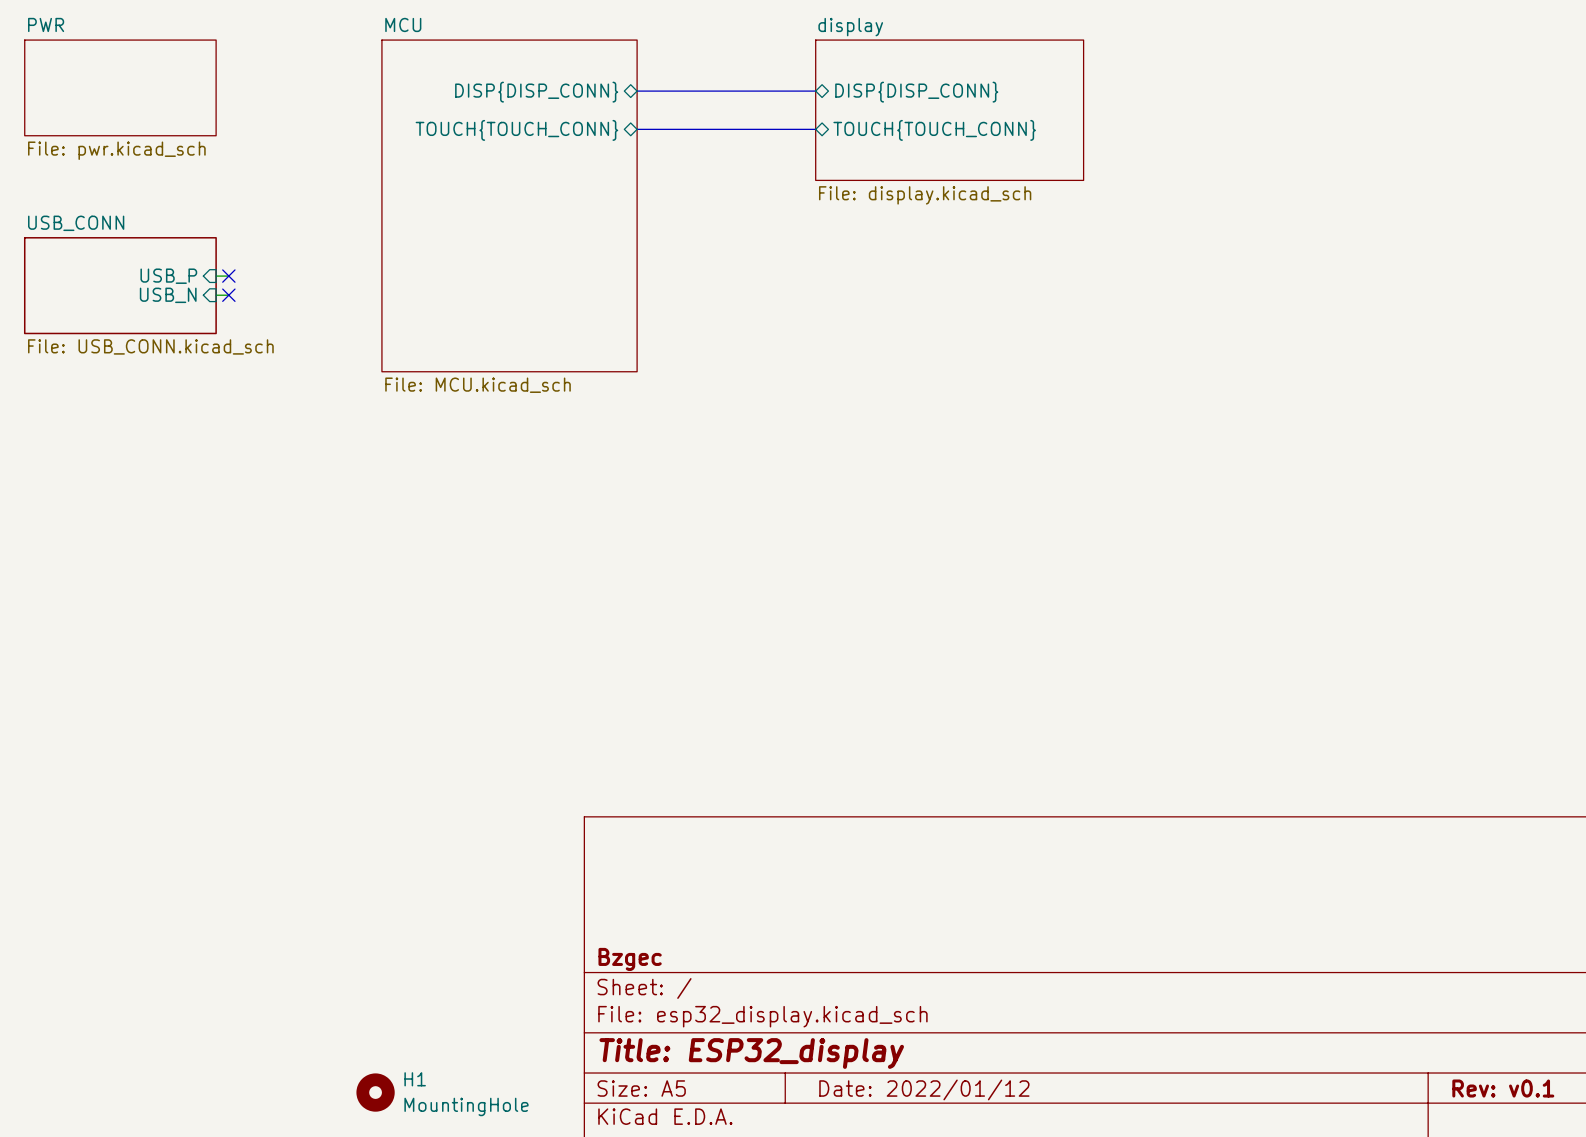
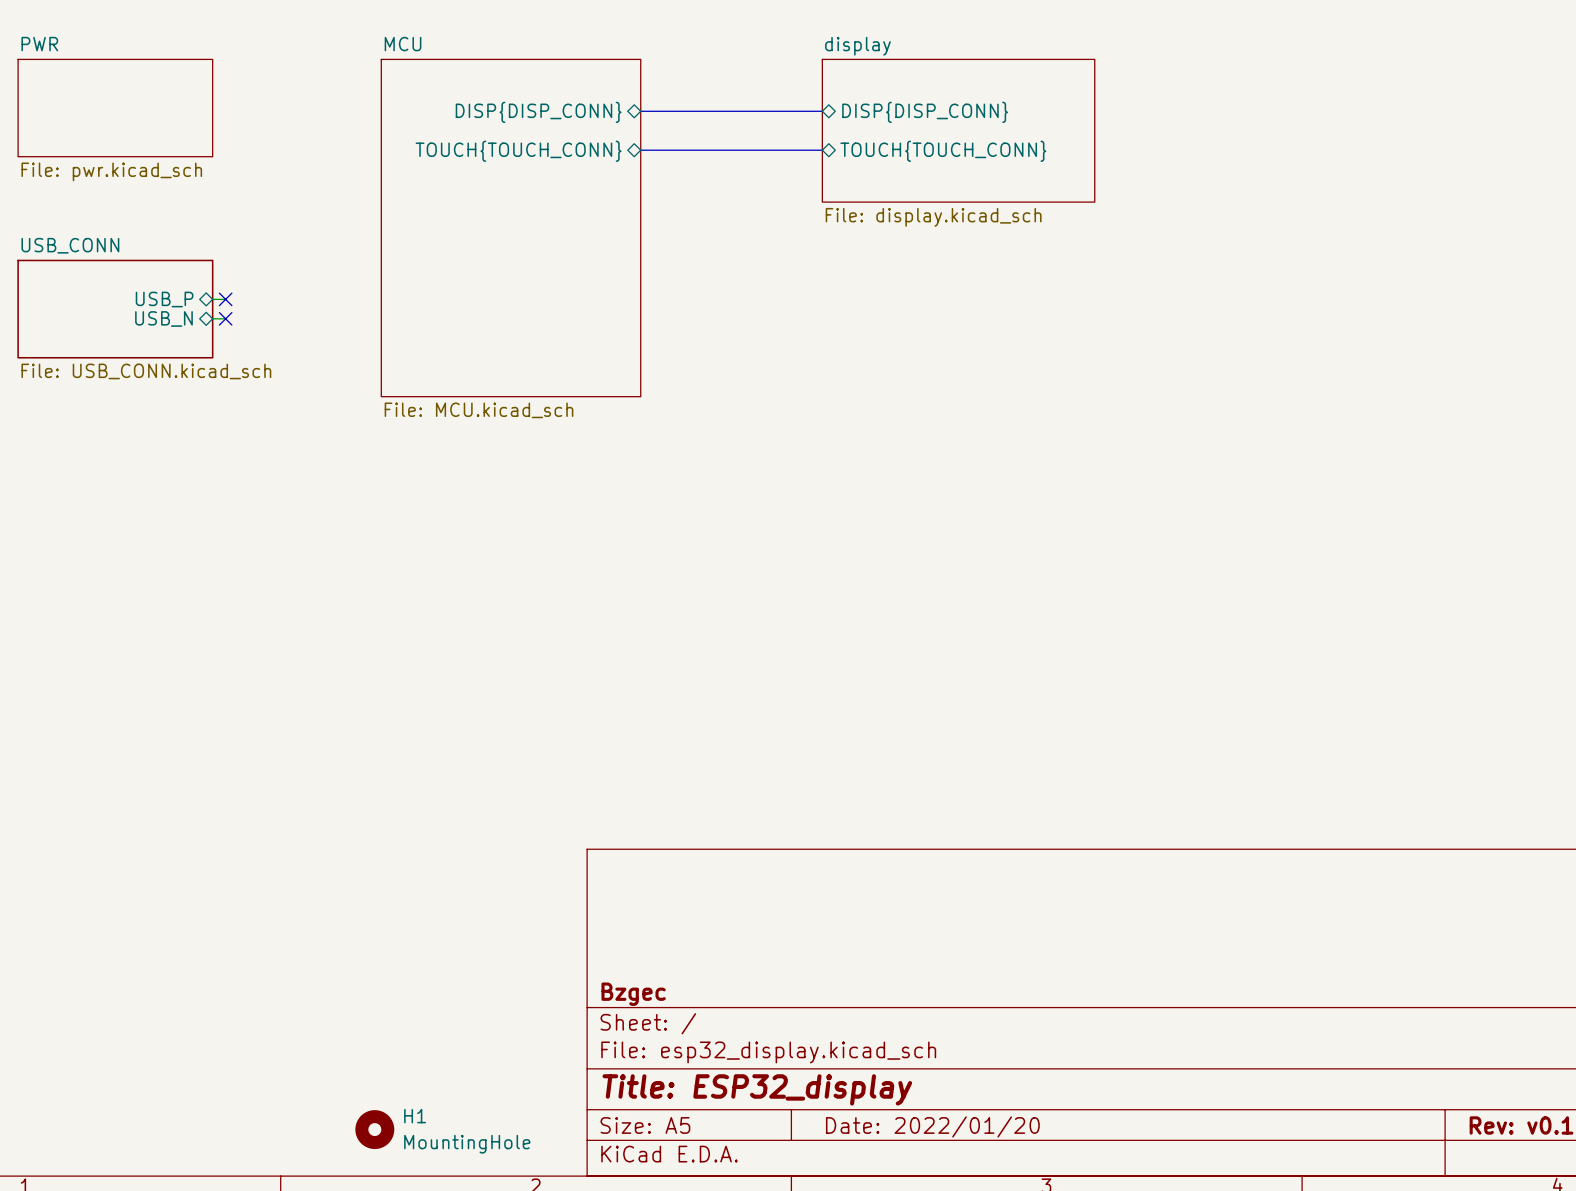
sheet pin shape: input (168, 276) -> bidirectional (164, 299)
sheet pin shape: input (168, 295) -> bidirectional (163, 318)
title block: Date: 2022/01/12 (924, 1089) -> Date: 2022/01/20 (932, 1126)

